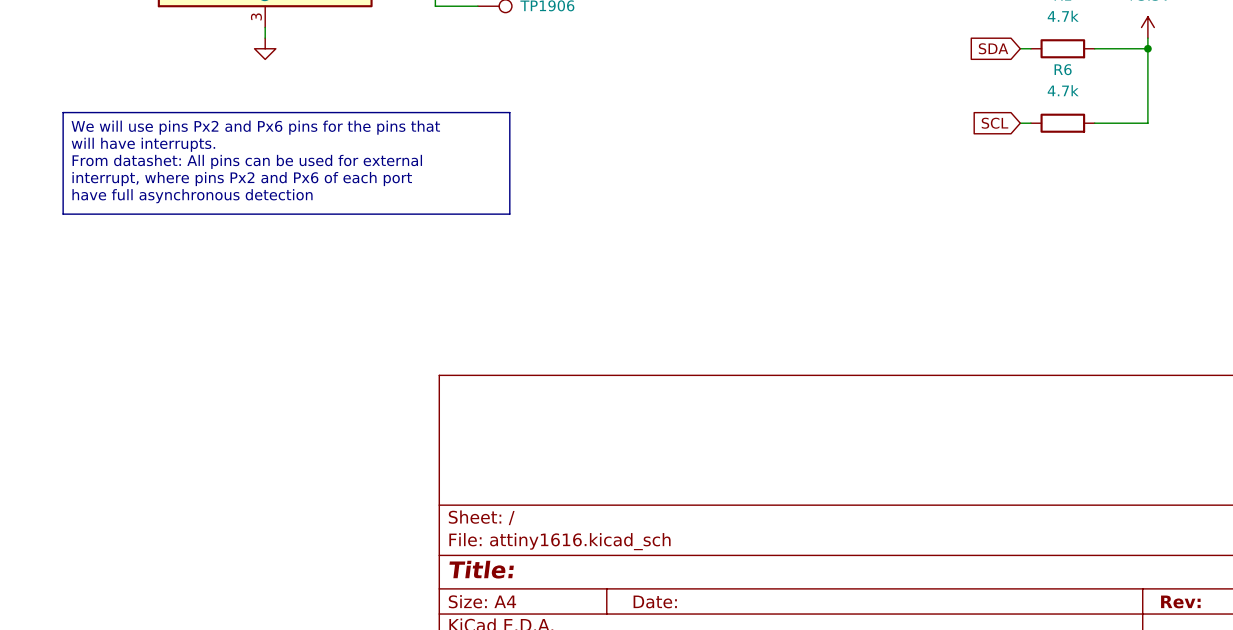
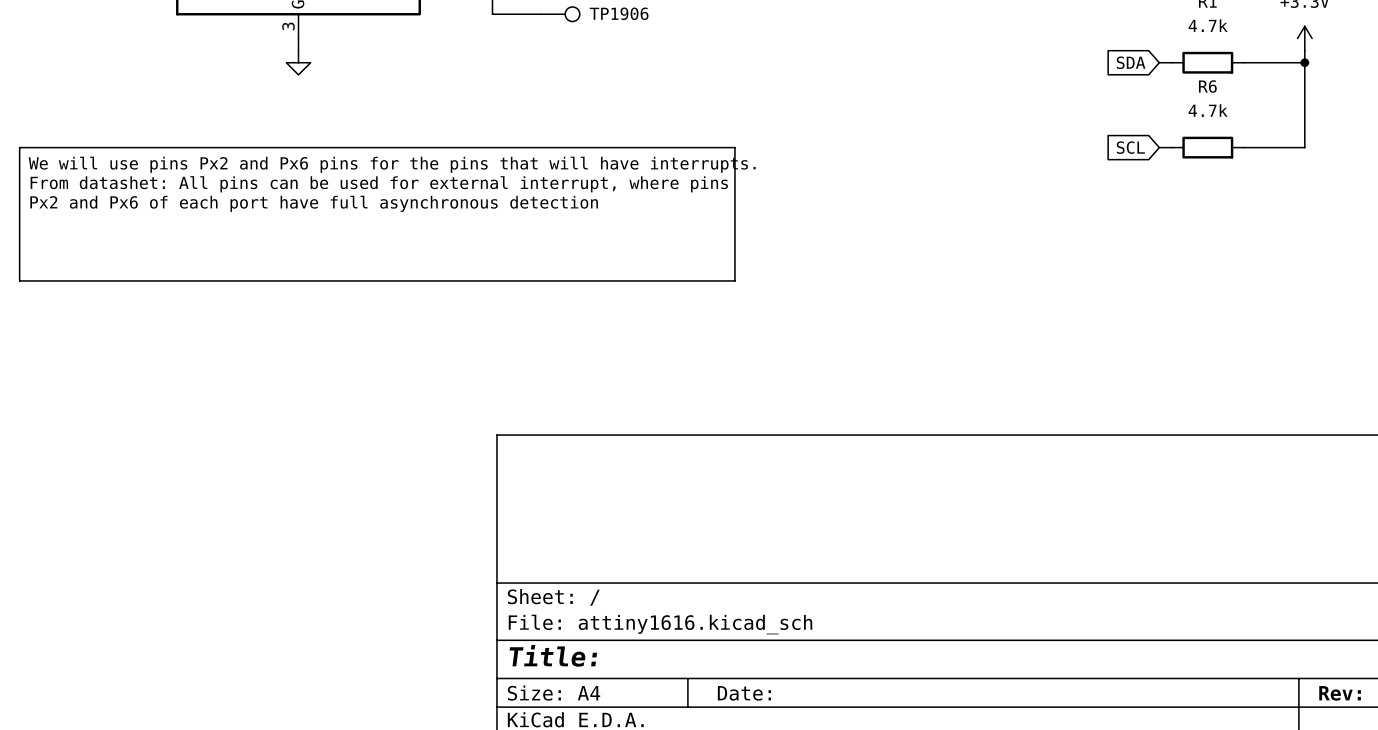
line: (63, 112) (509, 112) (509, 214) (63, 214) (63, 112) -> (19, 147) (19, 280) (734, 280) (734, 147) (19, 147)
text: We will use pins Px2 and Px6 pins for the pins that (255, 127) -> We will use pins Px2 and Px6 pins for the pins that will have interrupts. (392, 164)
text: will have interrupts. (143, 144) -> none
text: From datashet: All pins can be used for external (247, 161) -> From datashet: All pins can be used for external interrupt, where pins (379, 184)
text: none -> Px2 and Px6 of each port have full asynchronous detection (314, 203)
text: interrupt, where pins Px2 and Px6 of each port (242, 179) -> none
text: have full asynchronous detection (192, 196) -> none

